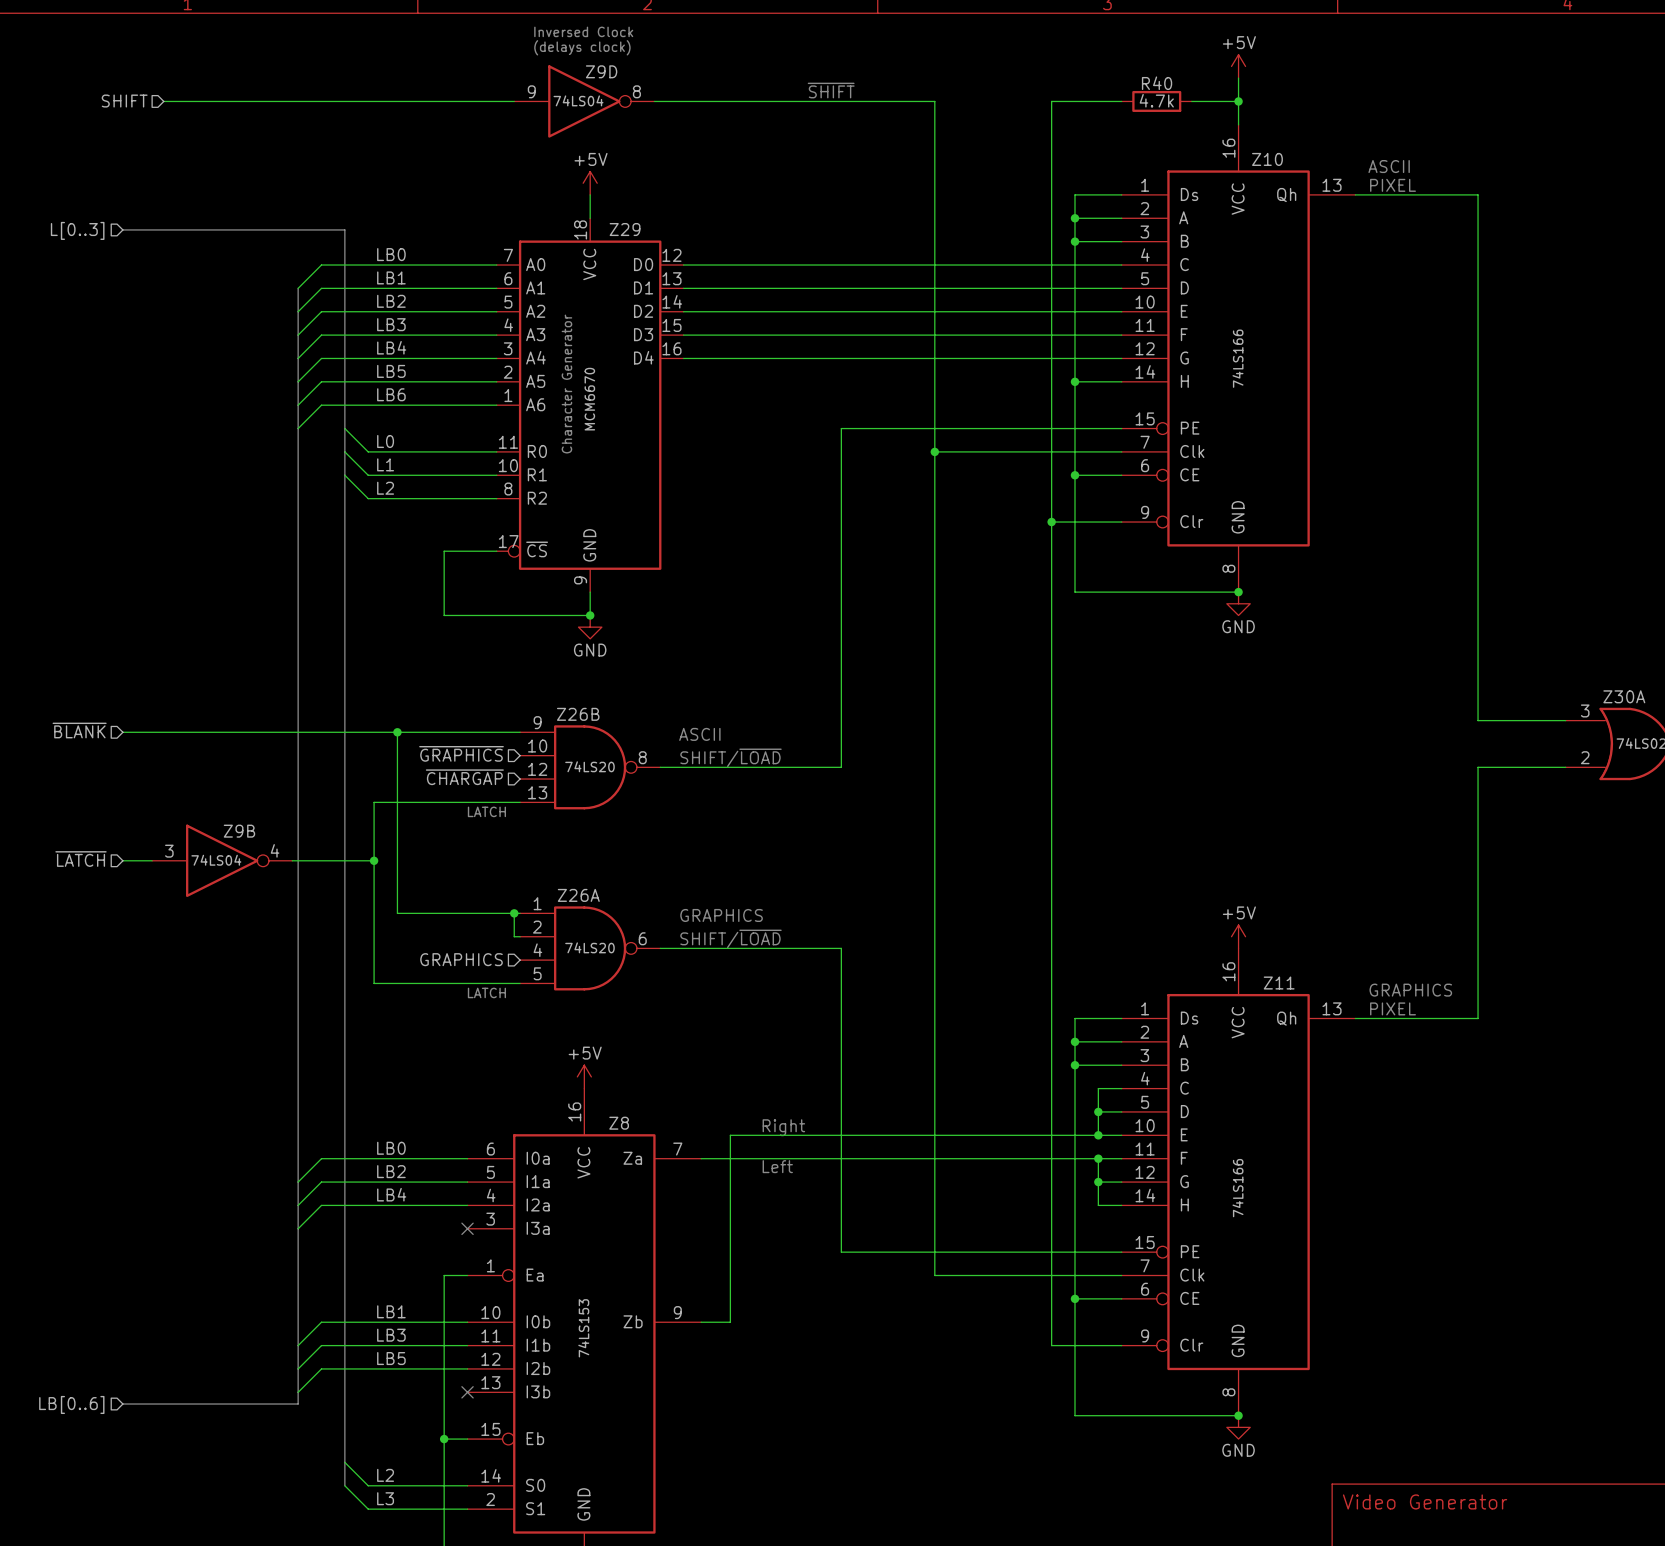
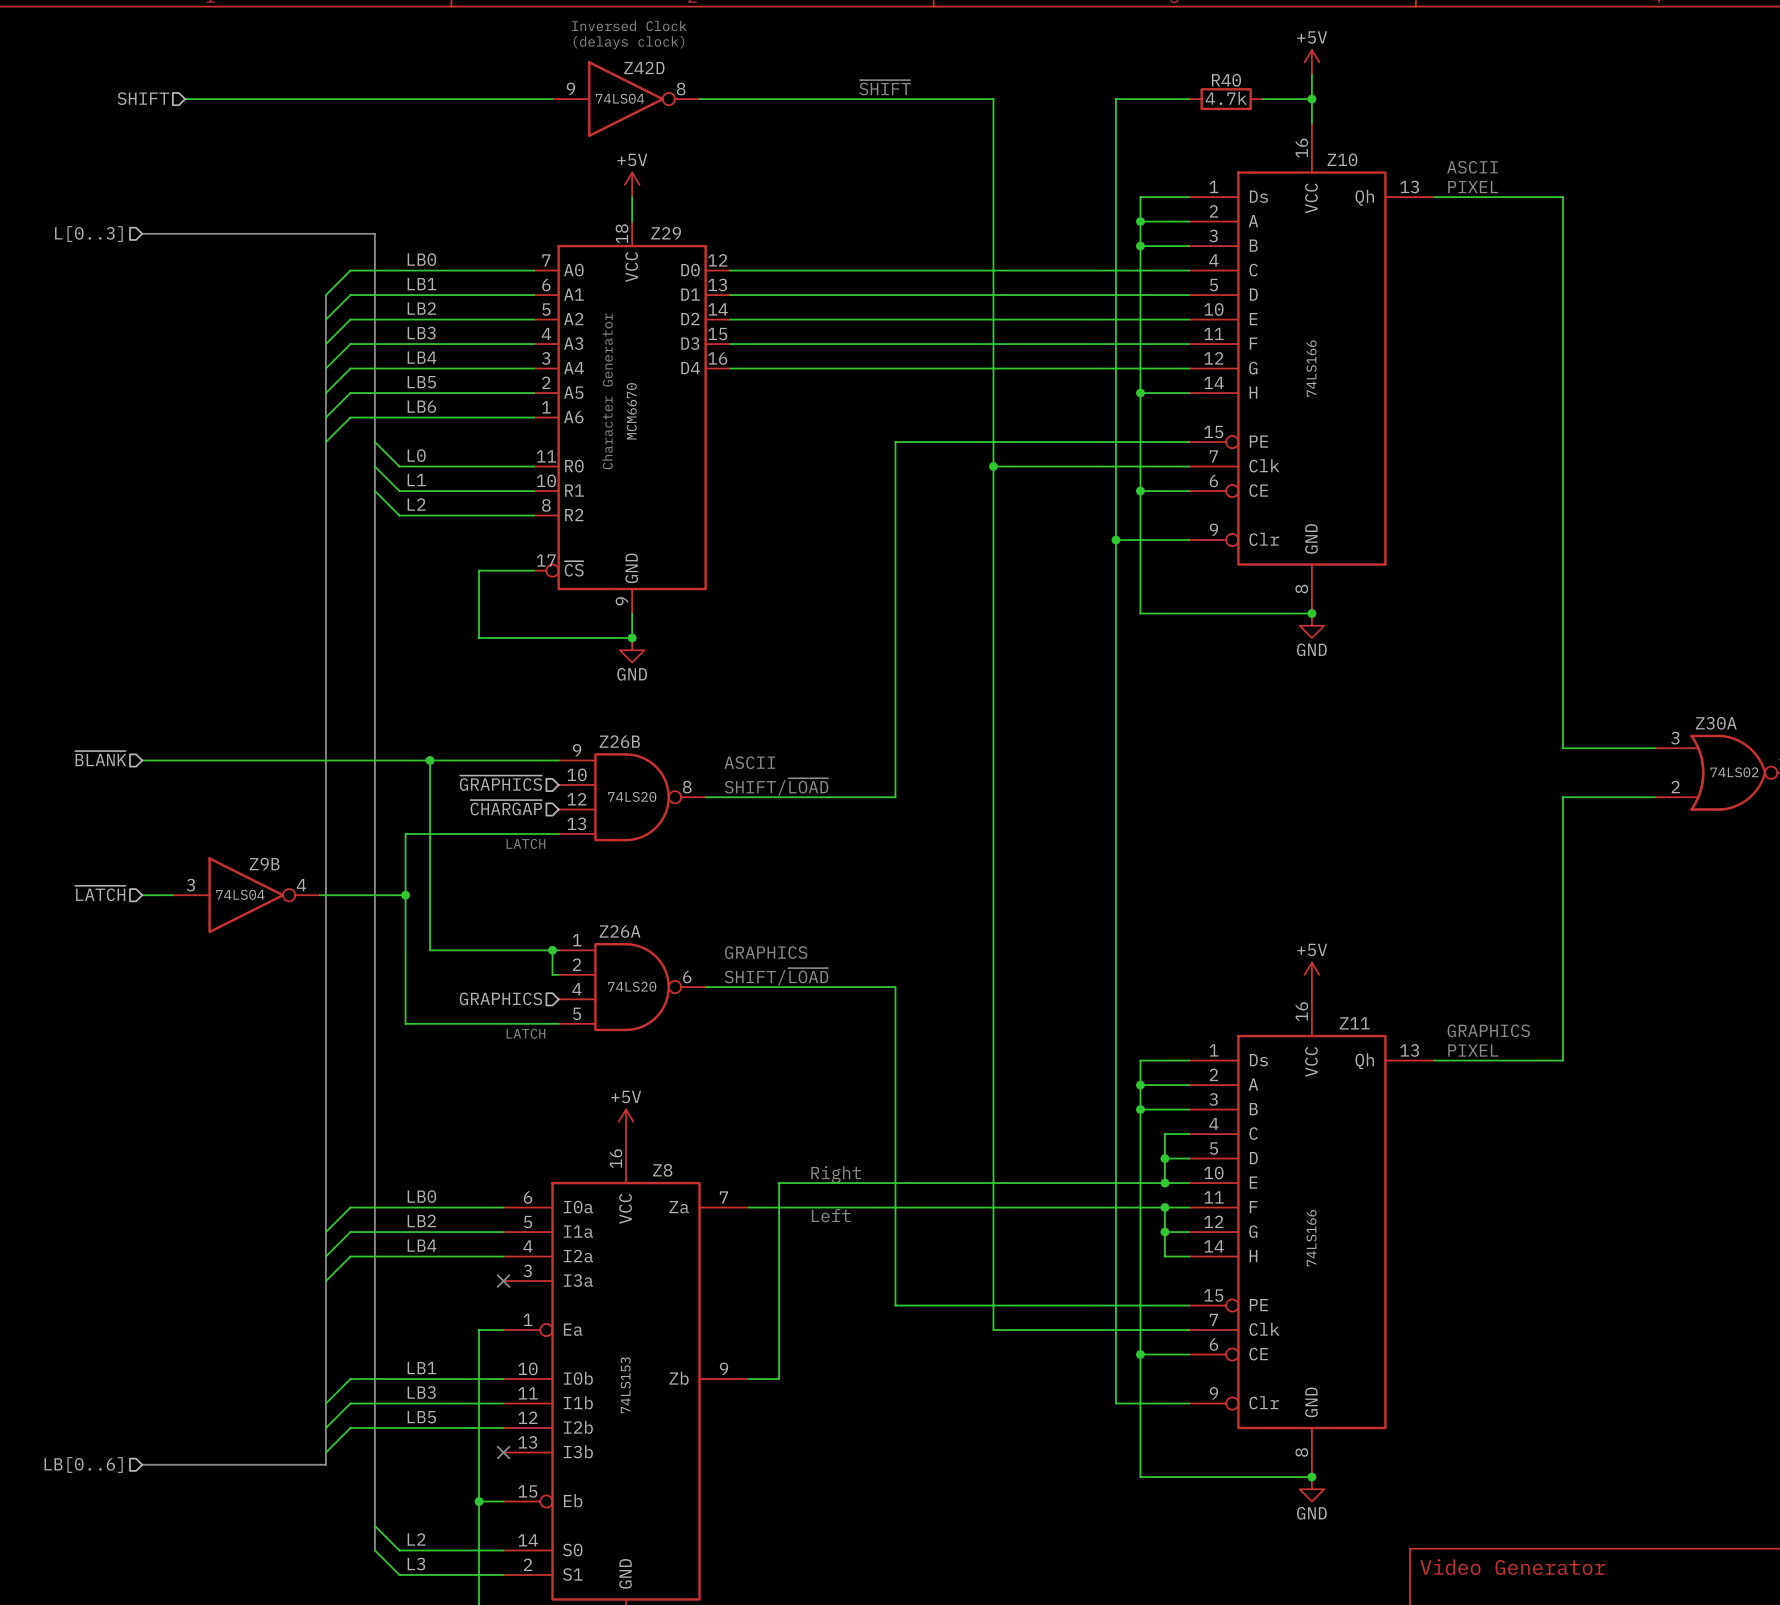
Z9D name: Z9D (601, 71) -> Z42D (644, 67)

